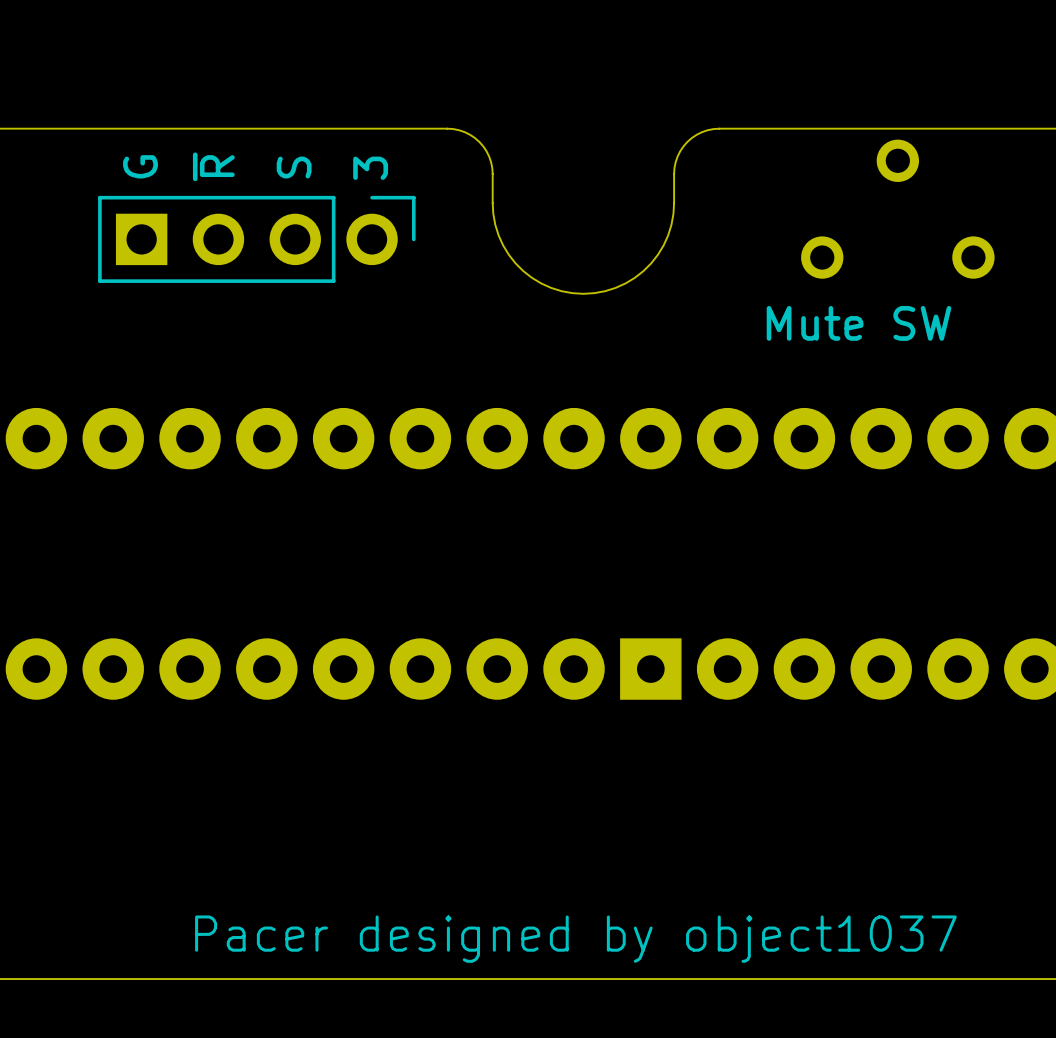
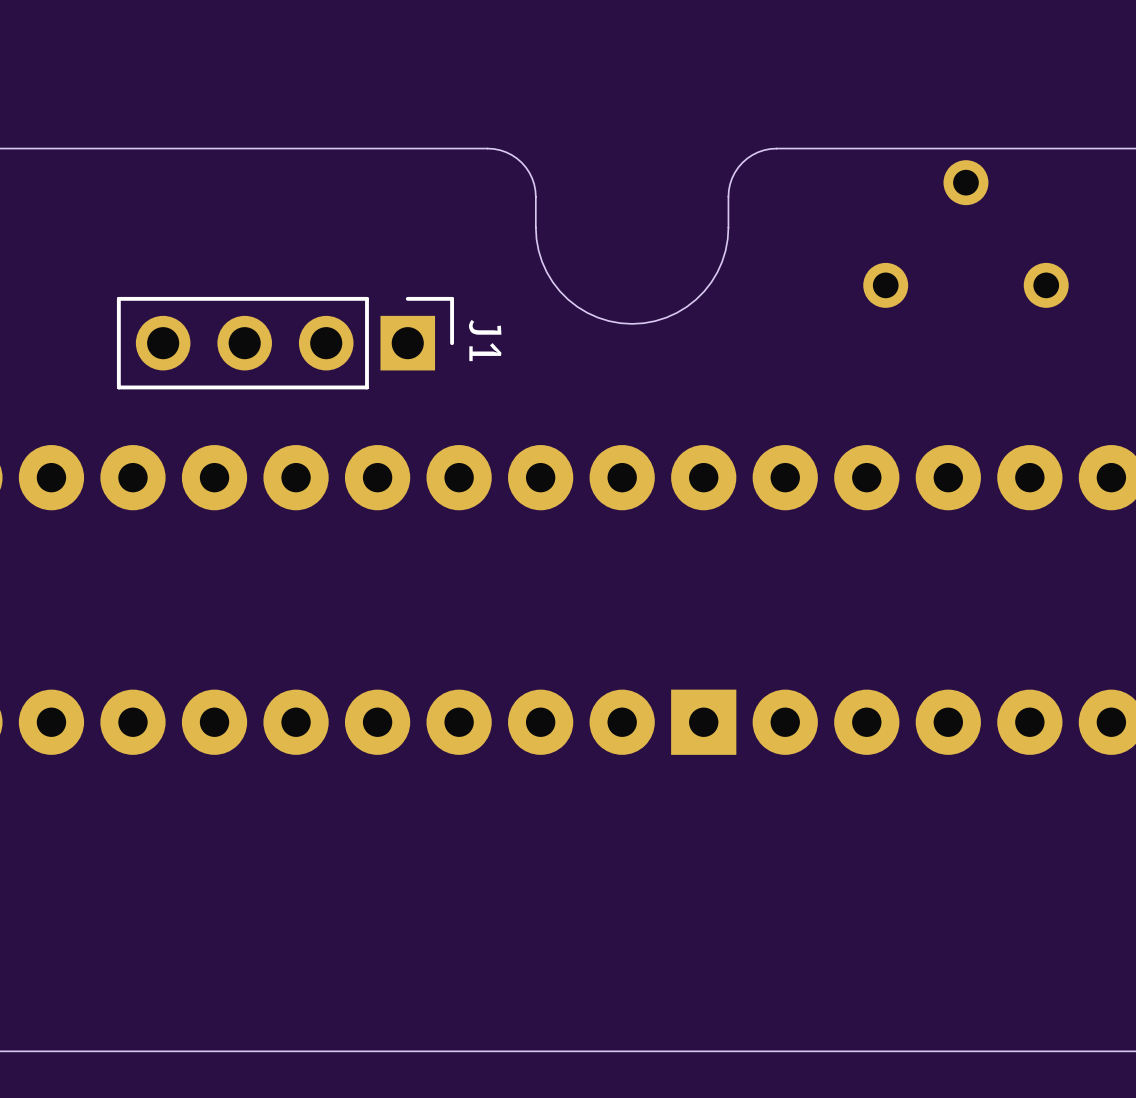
text: G (140, 166) -> none
text: ~{R} (213, 166) -> none
text: S (294, 167) -> none
text: 3 (370, 168) -> none
part: (256, 239) -> none
J1: none -> (285, 343)
text: Mute SW (858, 323) -> none
text: Pacer designed by object1037 (575, 939) -> none

